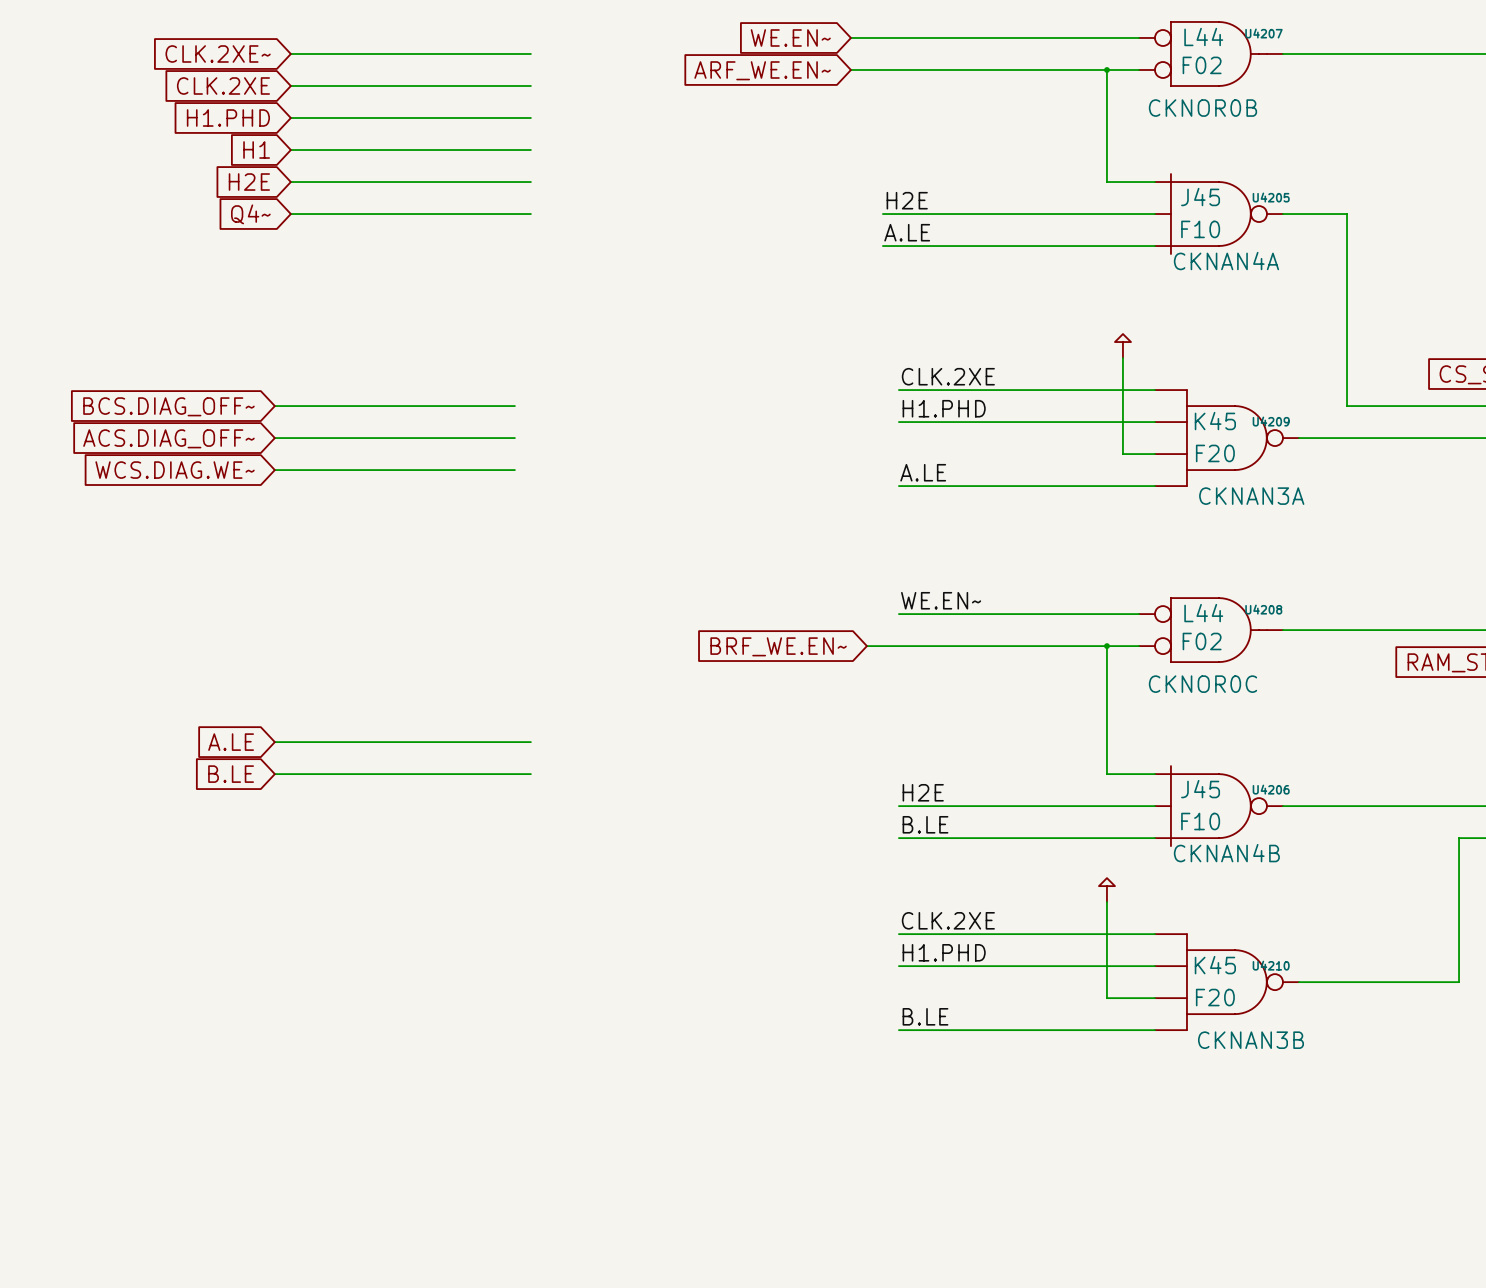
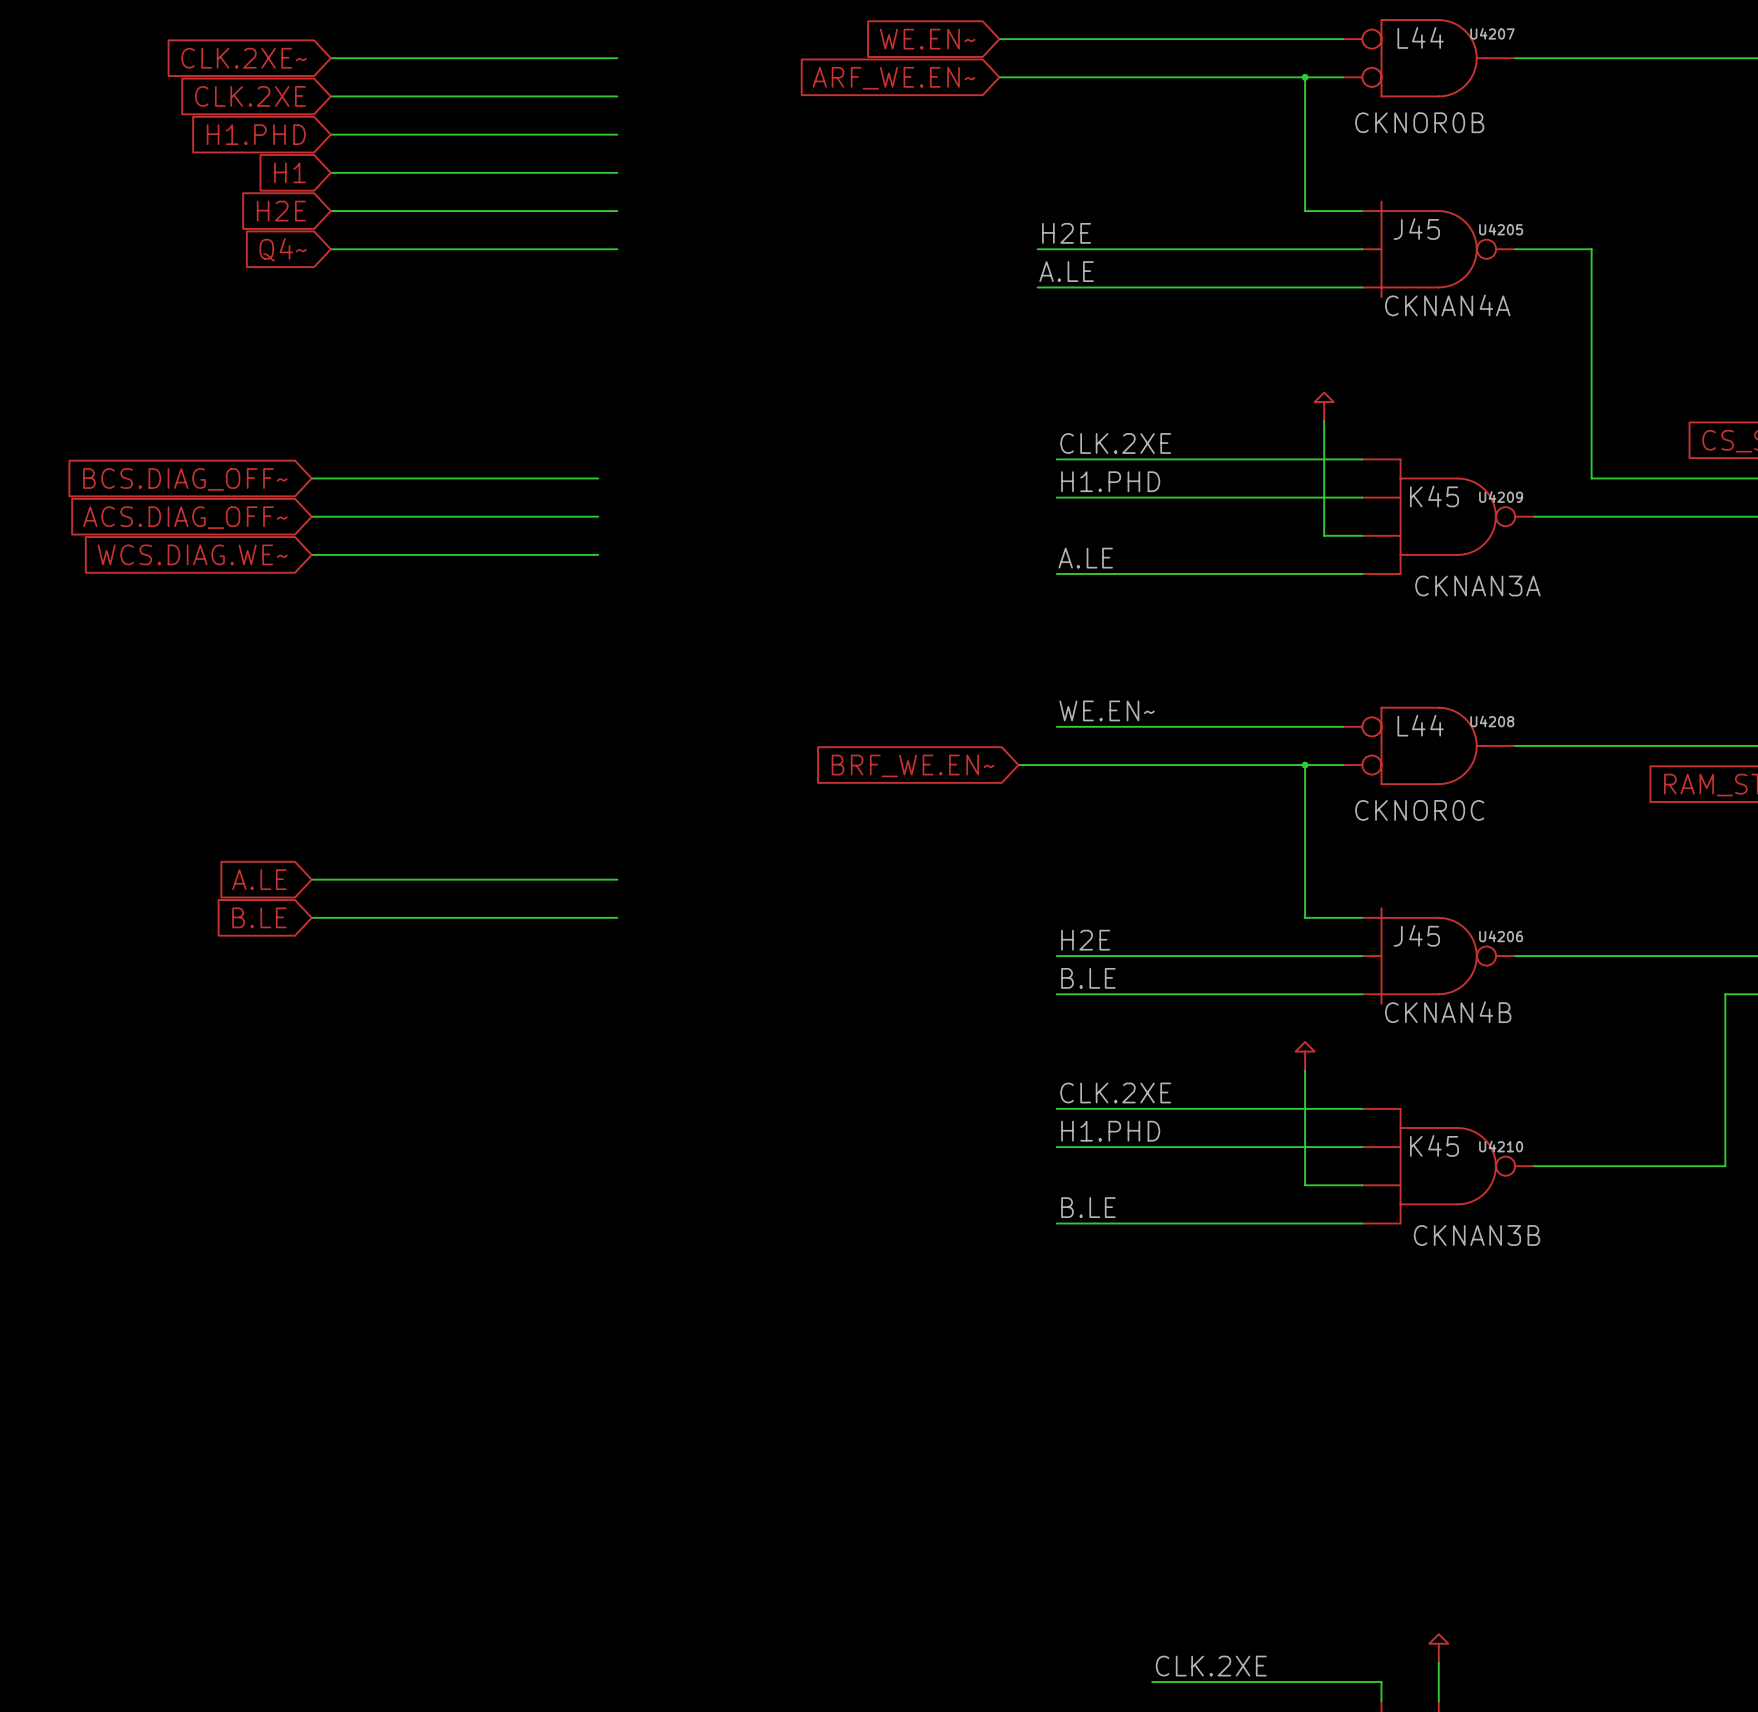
U4207 value: F02 (1202, 65) -> none
U4205 value: F10 (1200, 229) -> none
U4209 value: F20 (1215, 453) -> none
U4208 value: F02 (1202, 641) -> none
U4206 value: F10 (1200, 821) -> none
U4210 value: F20 (1215, 997) -> none

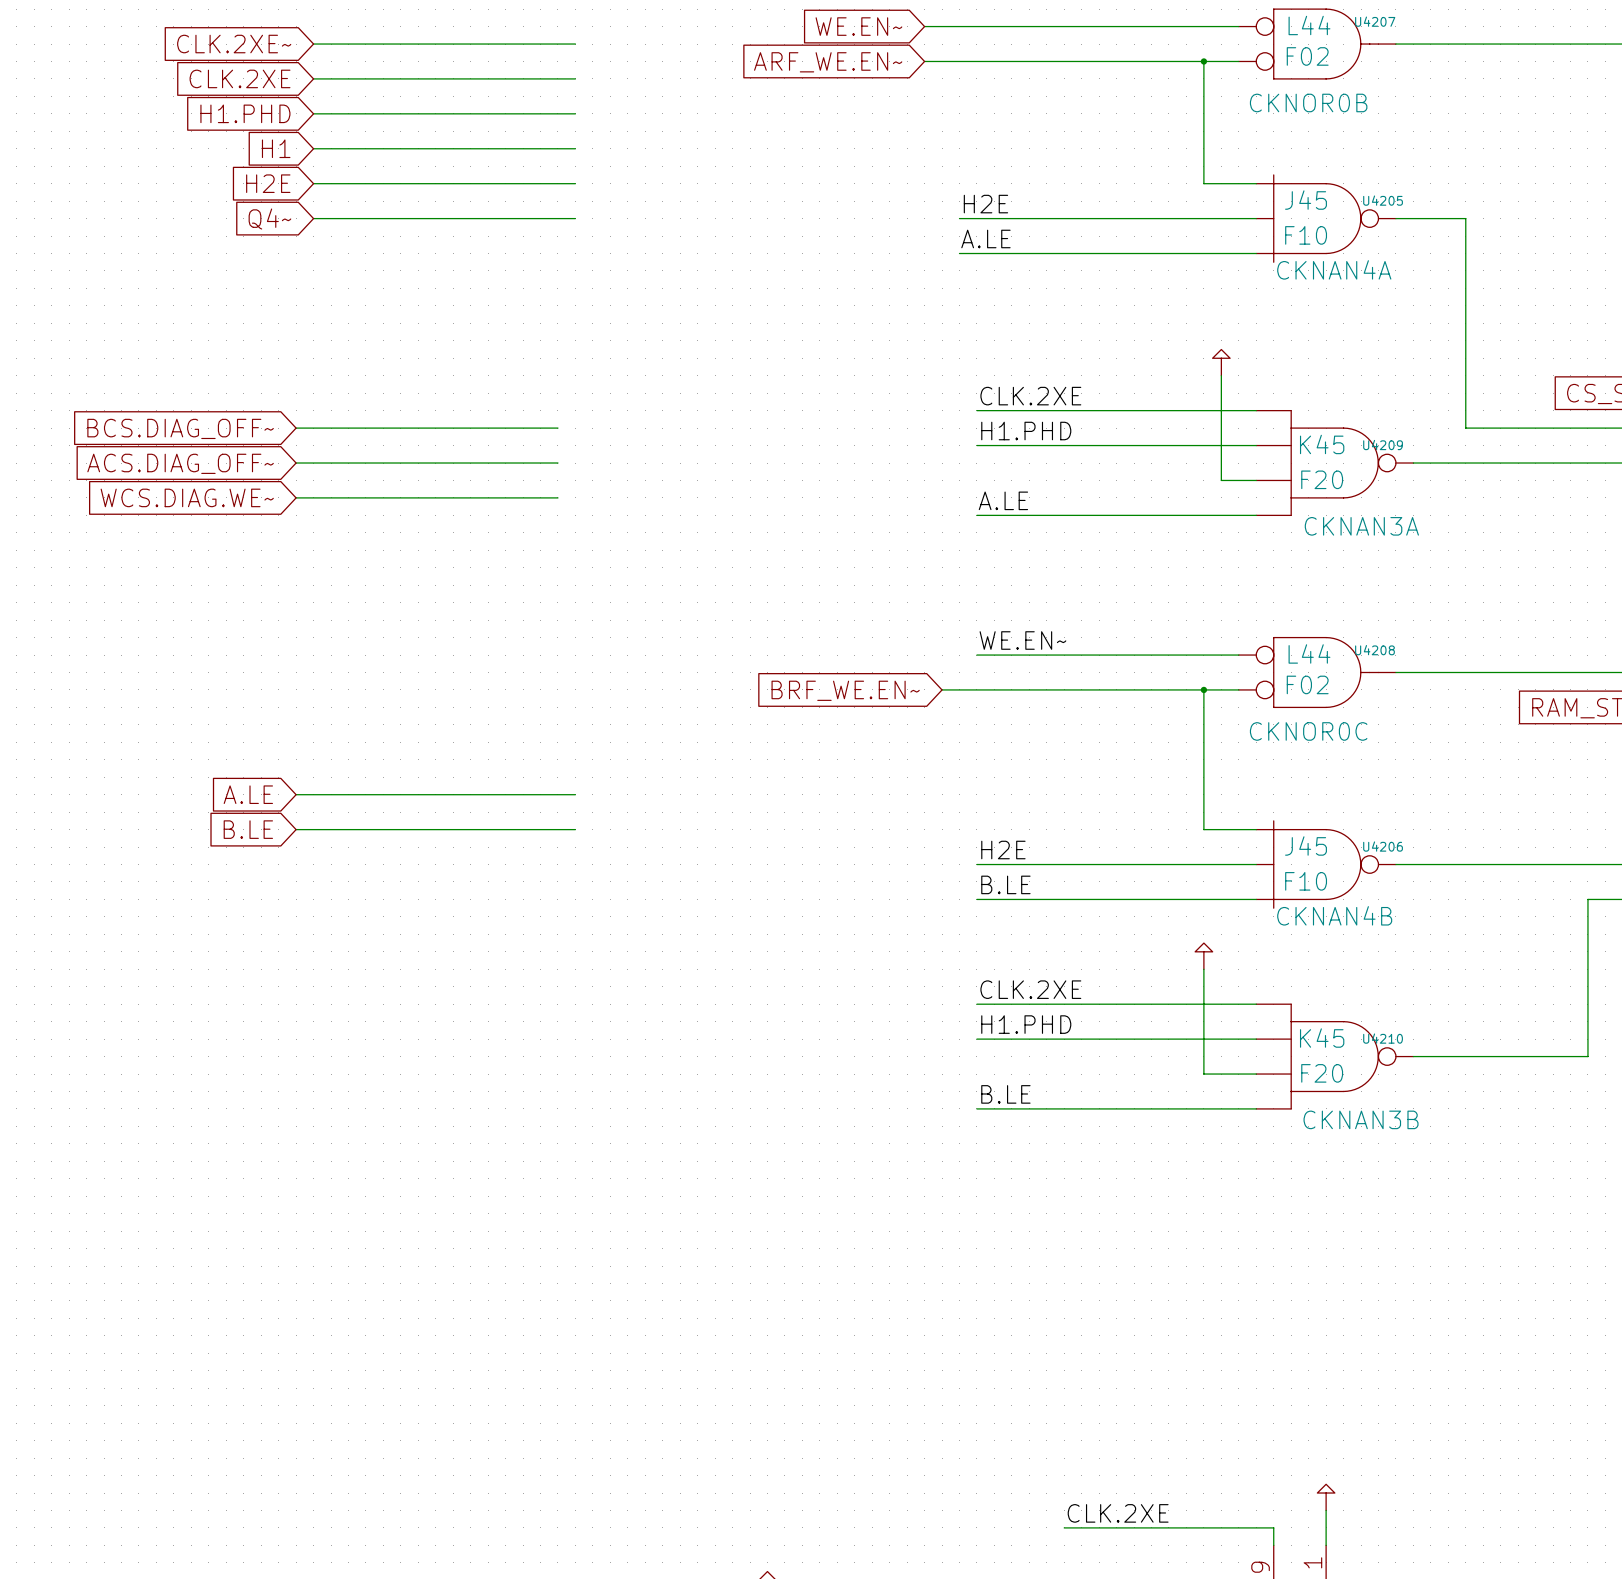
U4207 value: none -> F02 (1307, 56)
U4205 value: none -> F10 (1306, 235)
U4209 value: none -> F20 (1322, 479)
U4208 value: none -> F02 (1307, 684)
U4206 value: none -> F10 (1306, 881)
U4210 value: none -> F20 (1322, 1073)

